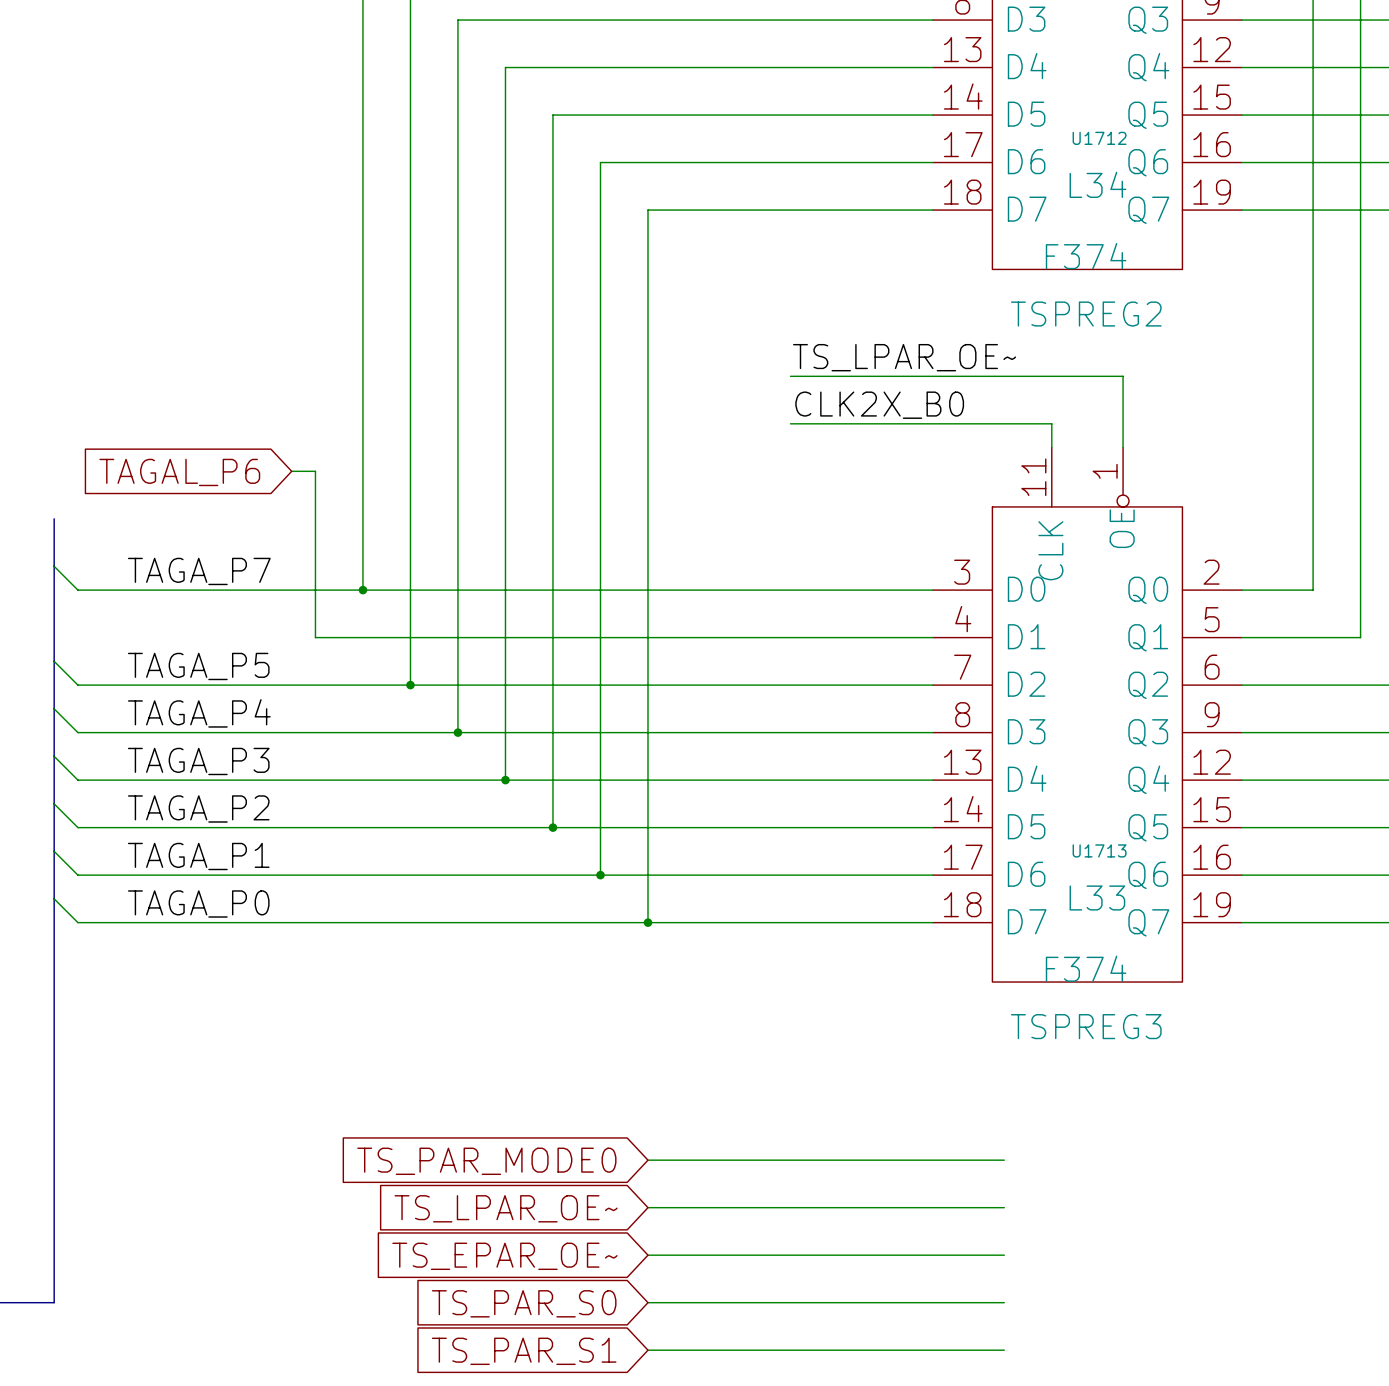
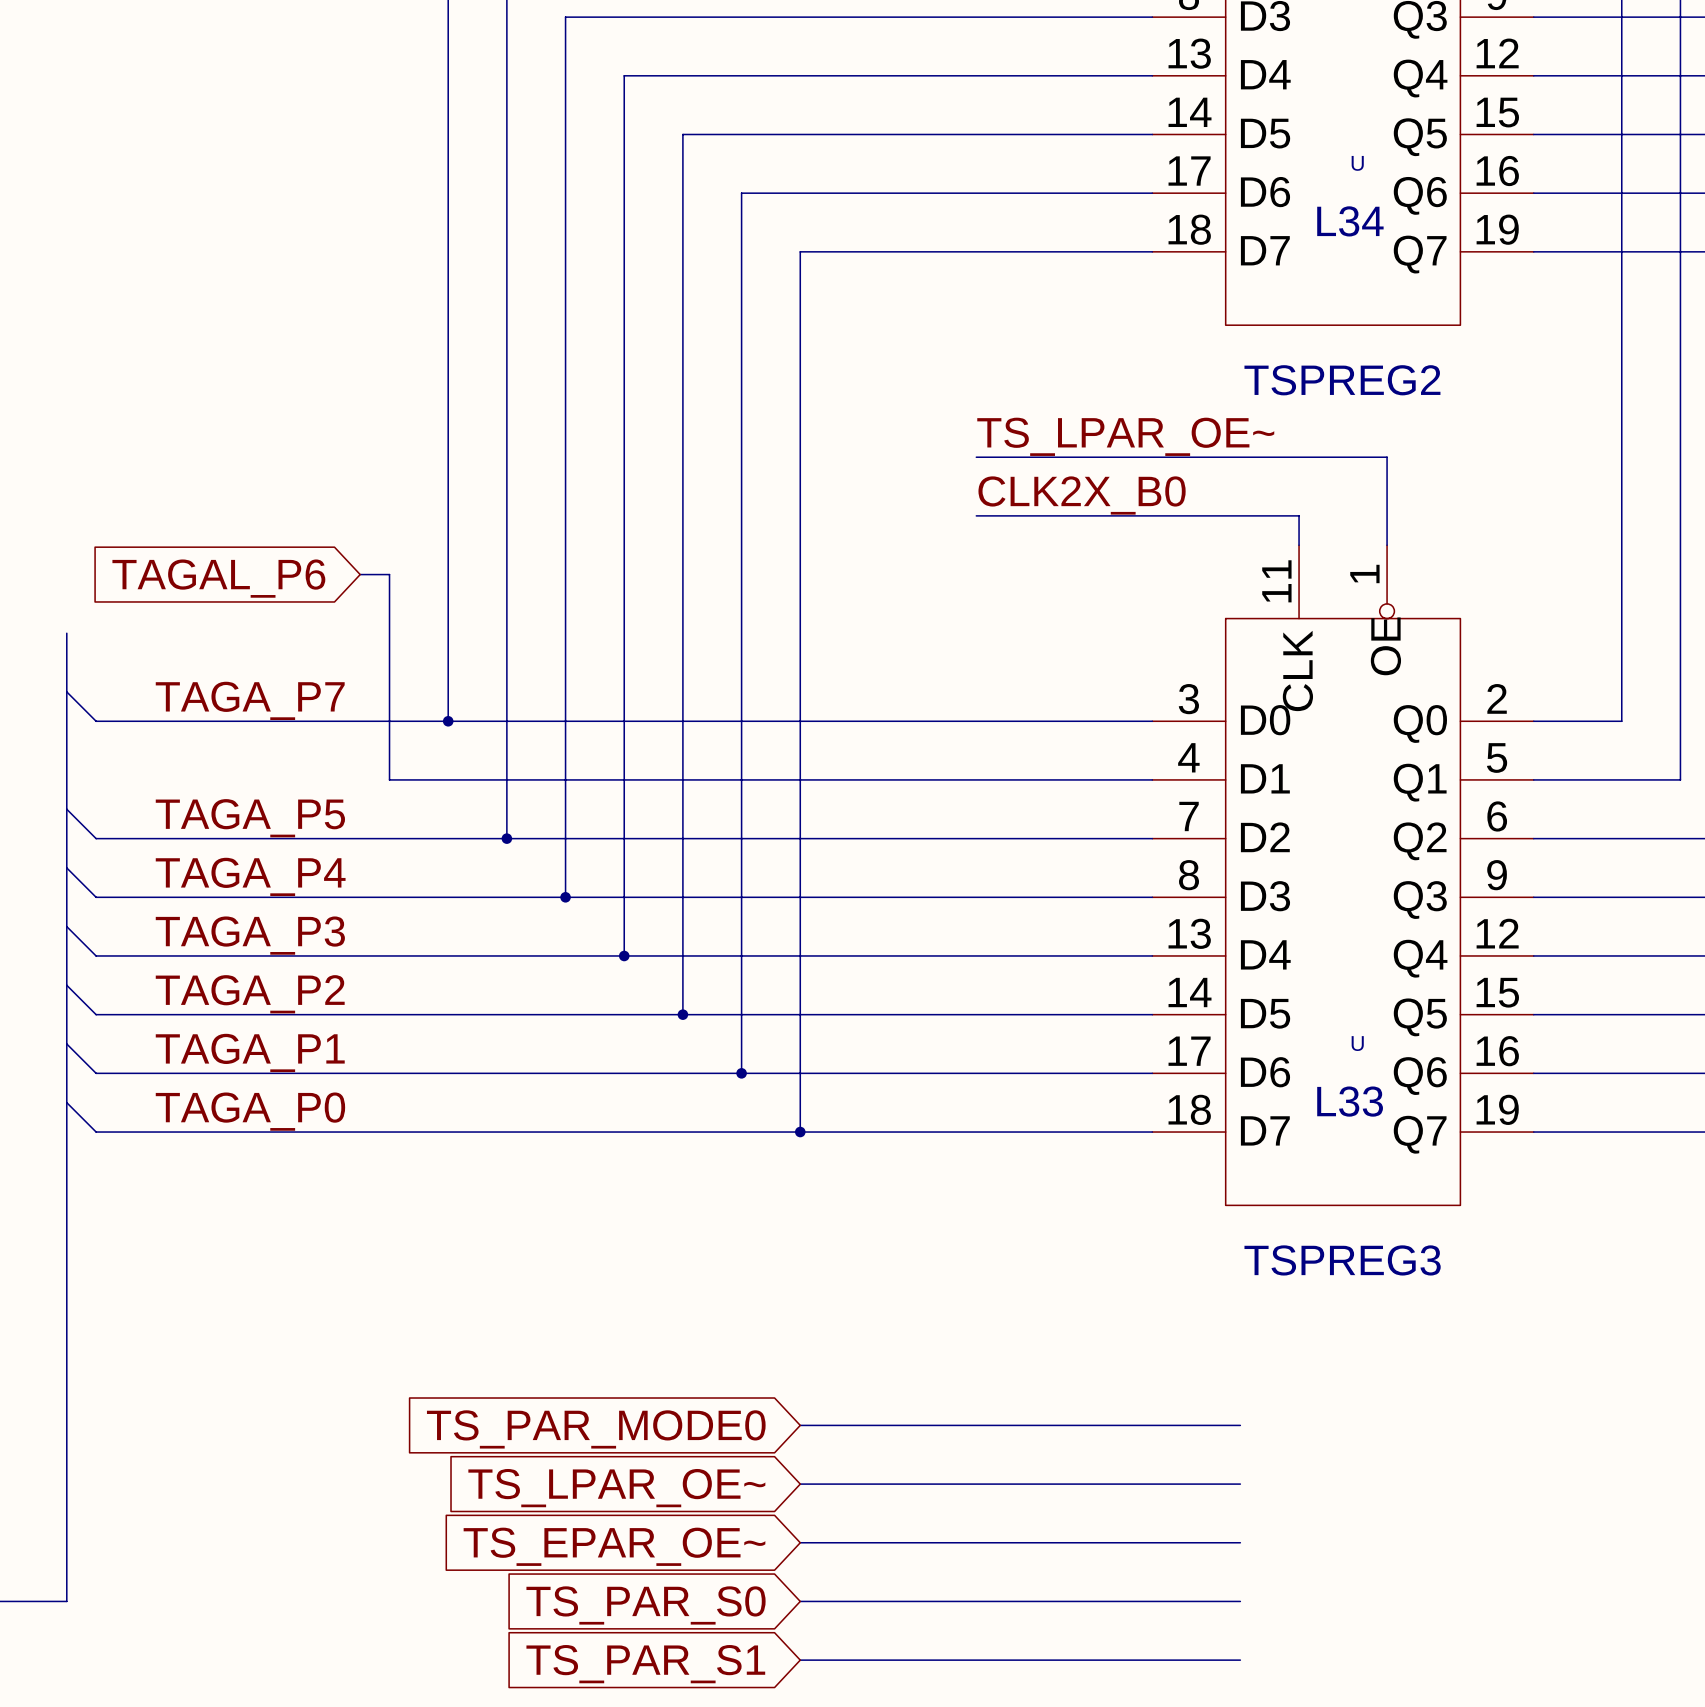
U1712 name: U1712 (1099, 138) -> U (1357, 163)
U1712 value: F374 (1086, 256) -> none
U1713 name: U1713 (1099, 850) -> U (1357, 1043)
U1713 value: F374 (1086, 968) -> none

